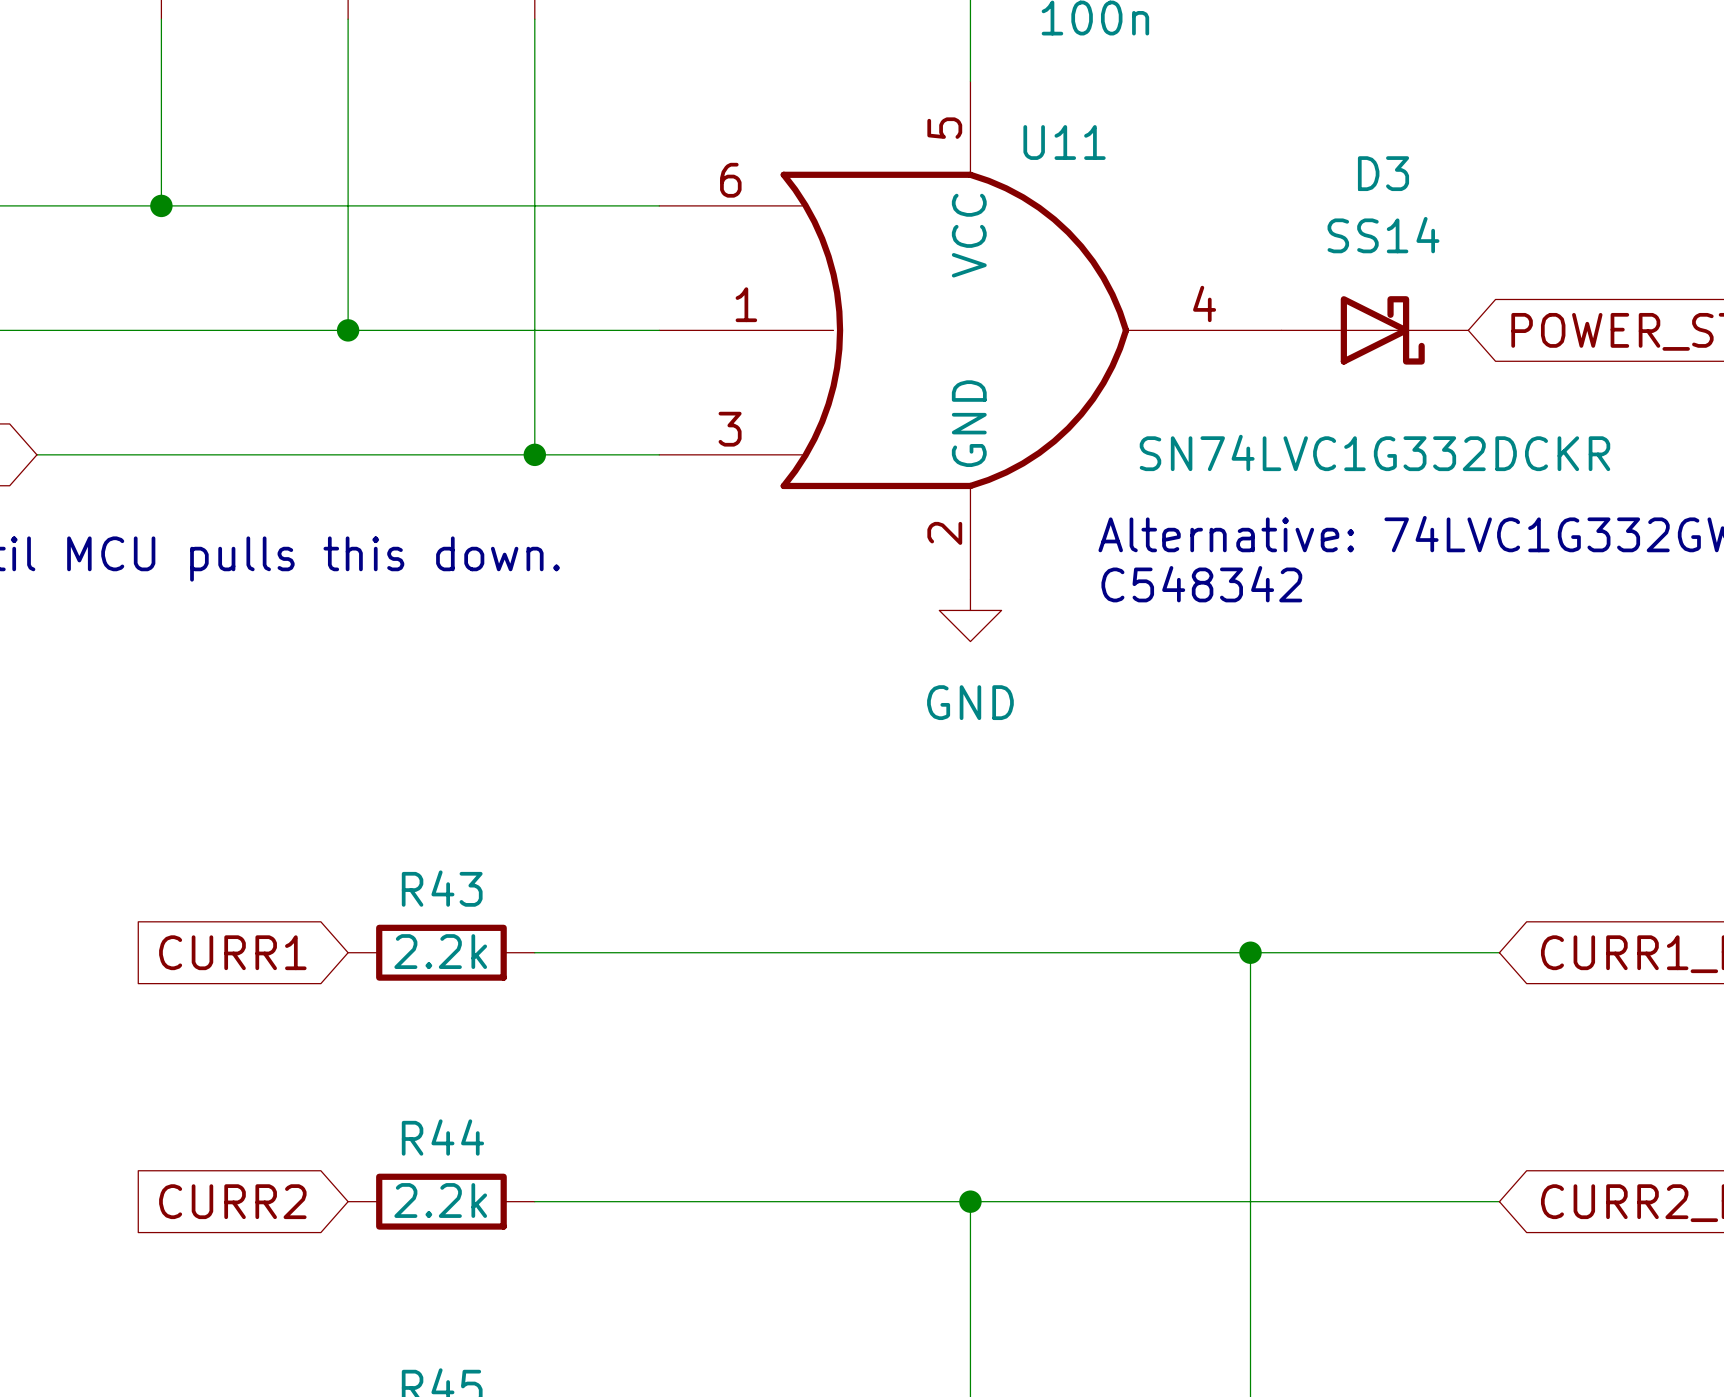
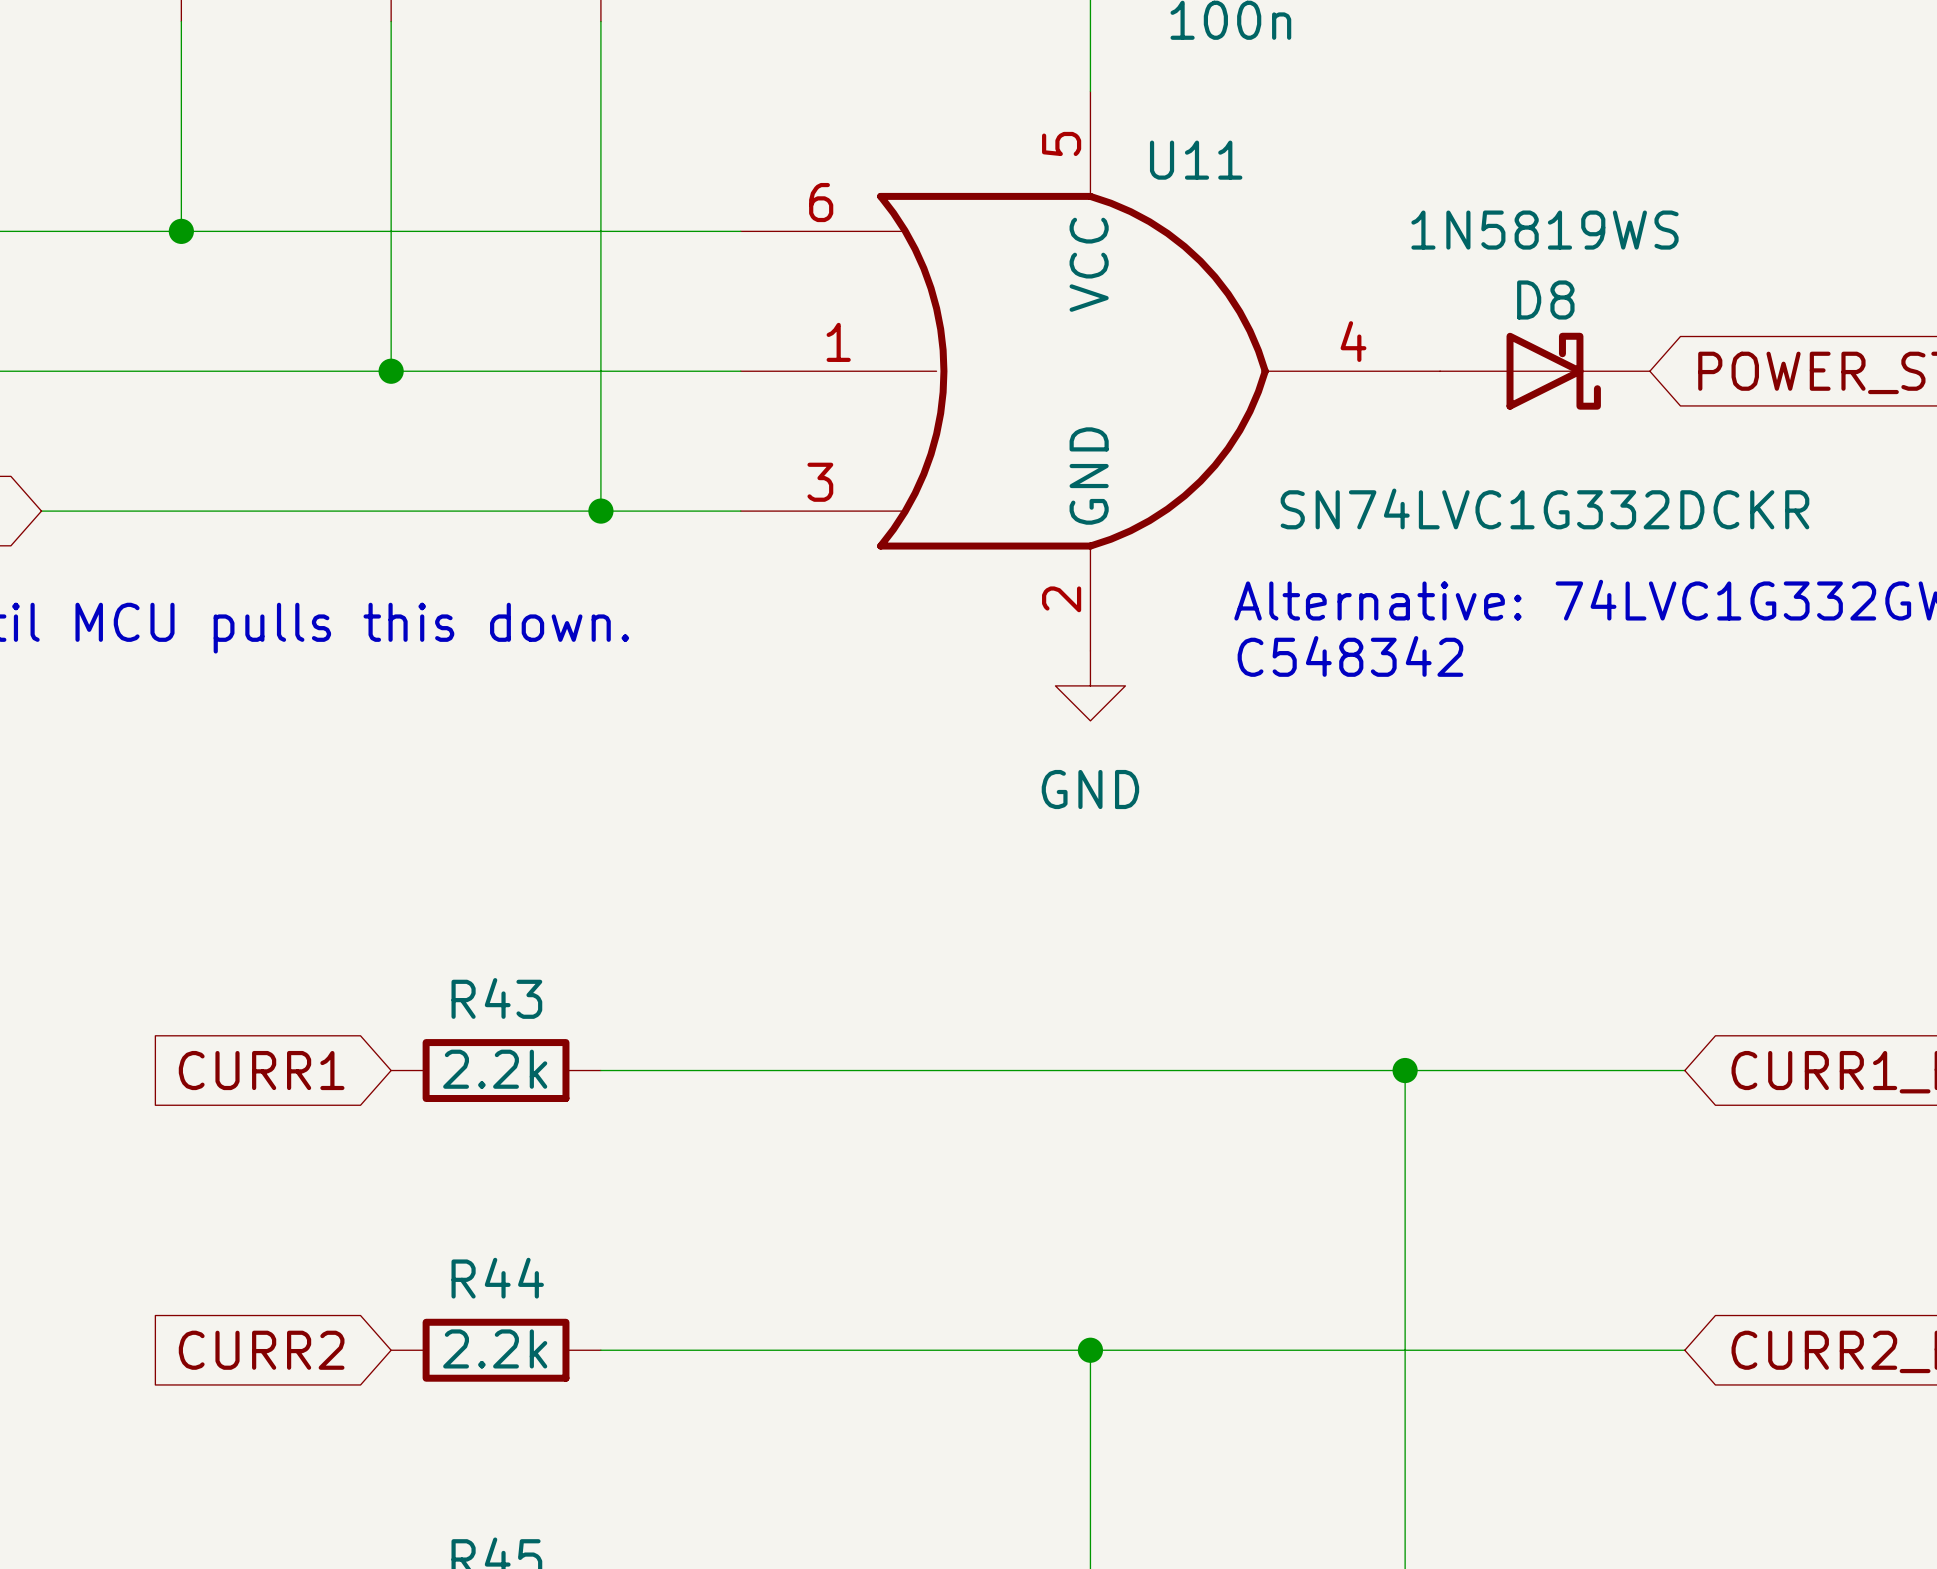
D3 name: D3 (1383, 173) -> D8 (1545, 299)
D3 value: SS14 (1383, 235) -> 1N5819WS (1544, 230)

